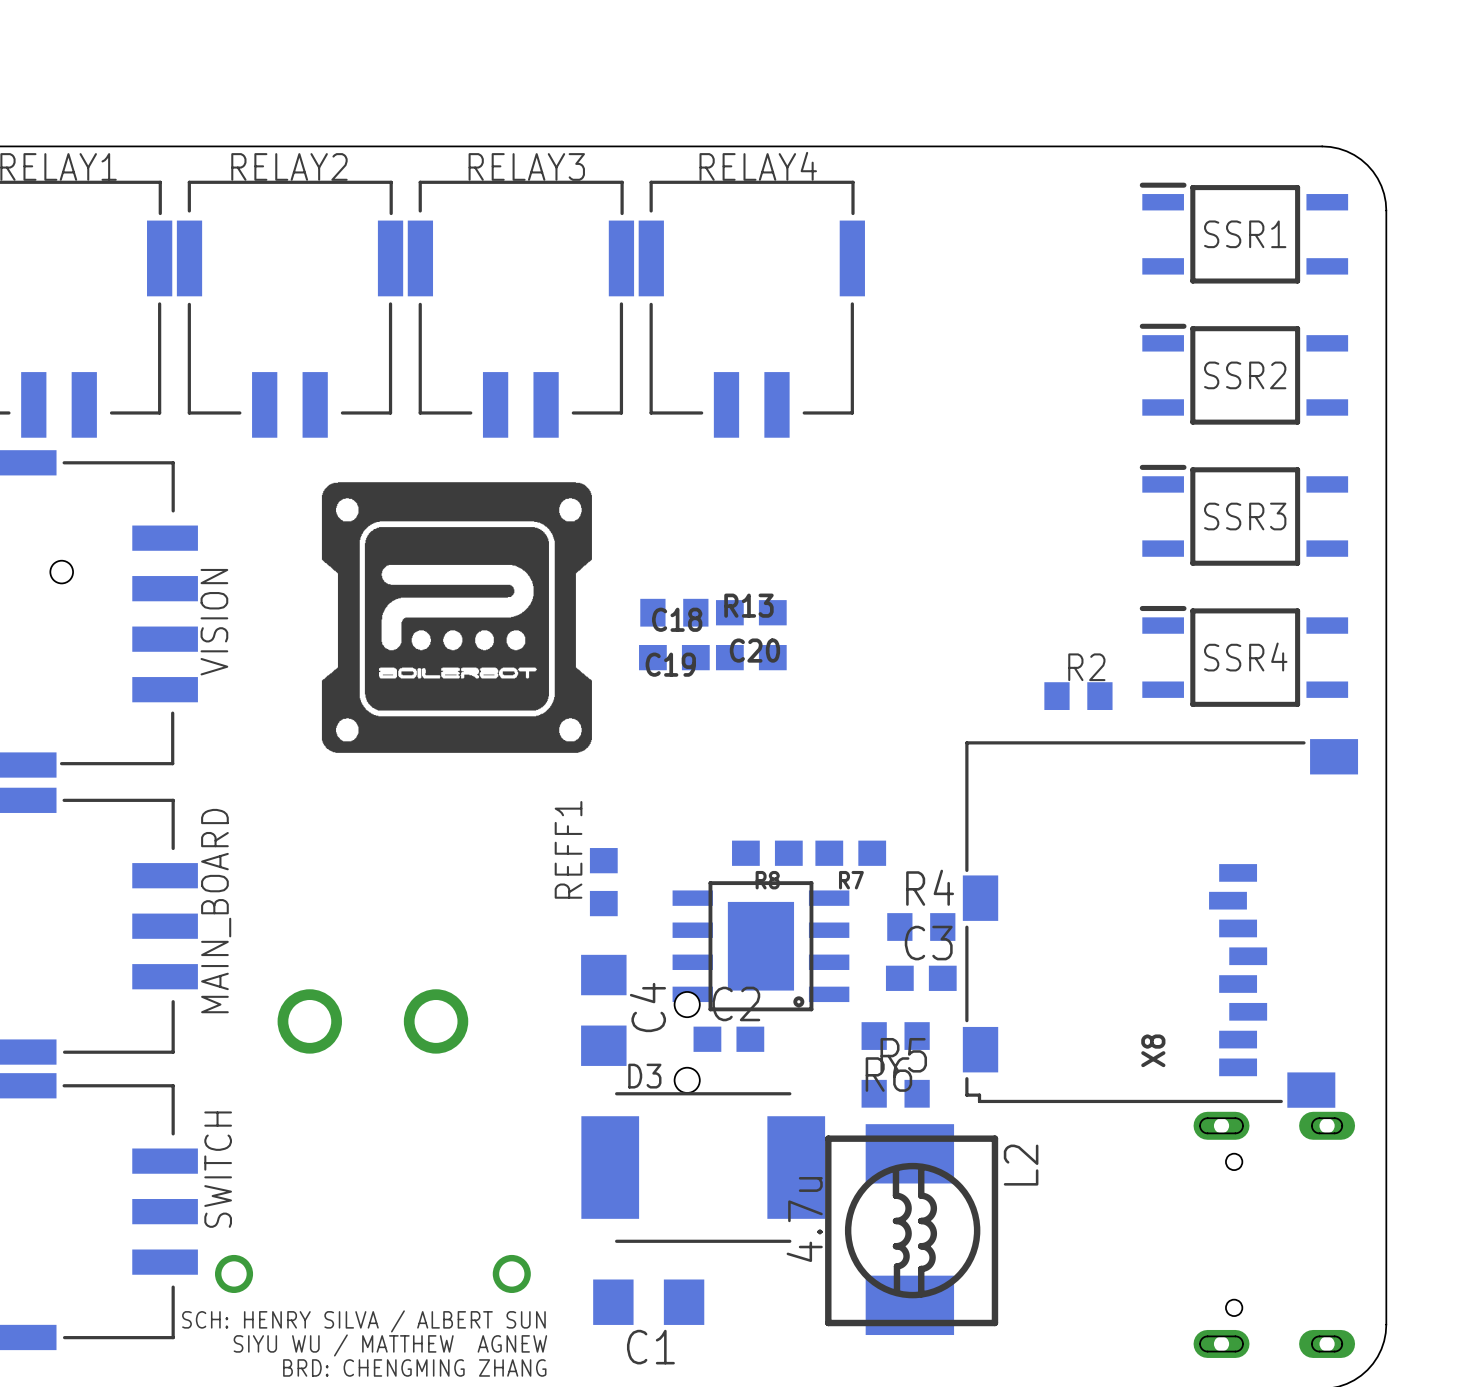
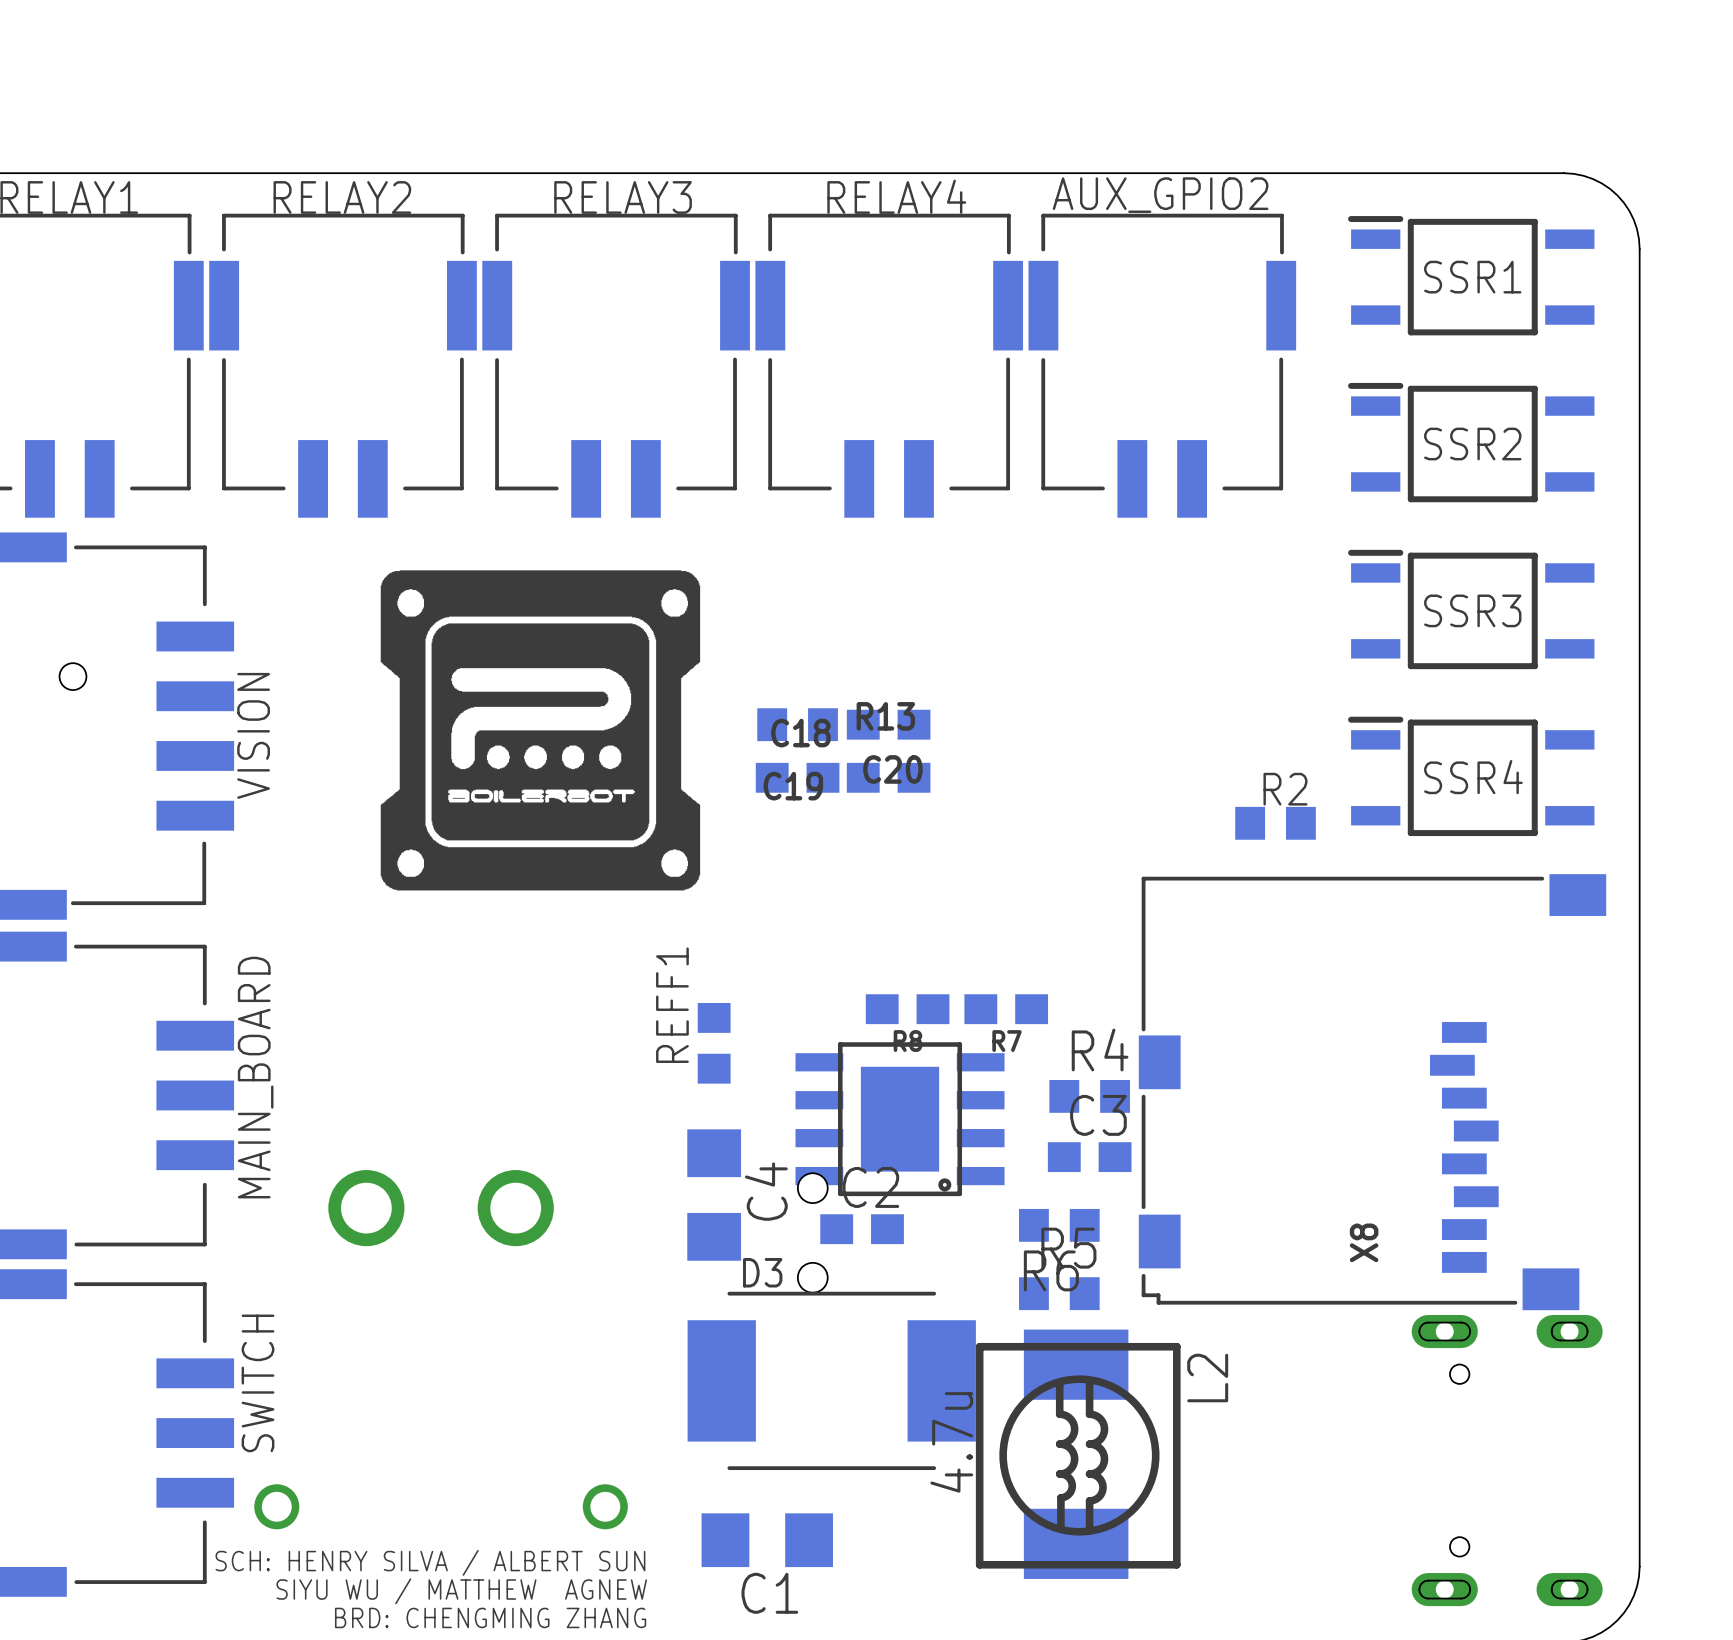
AUX_GPIO2: none -> (1162, 365)

